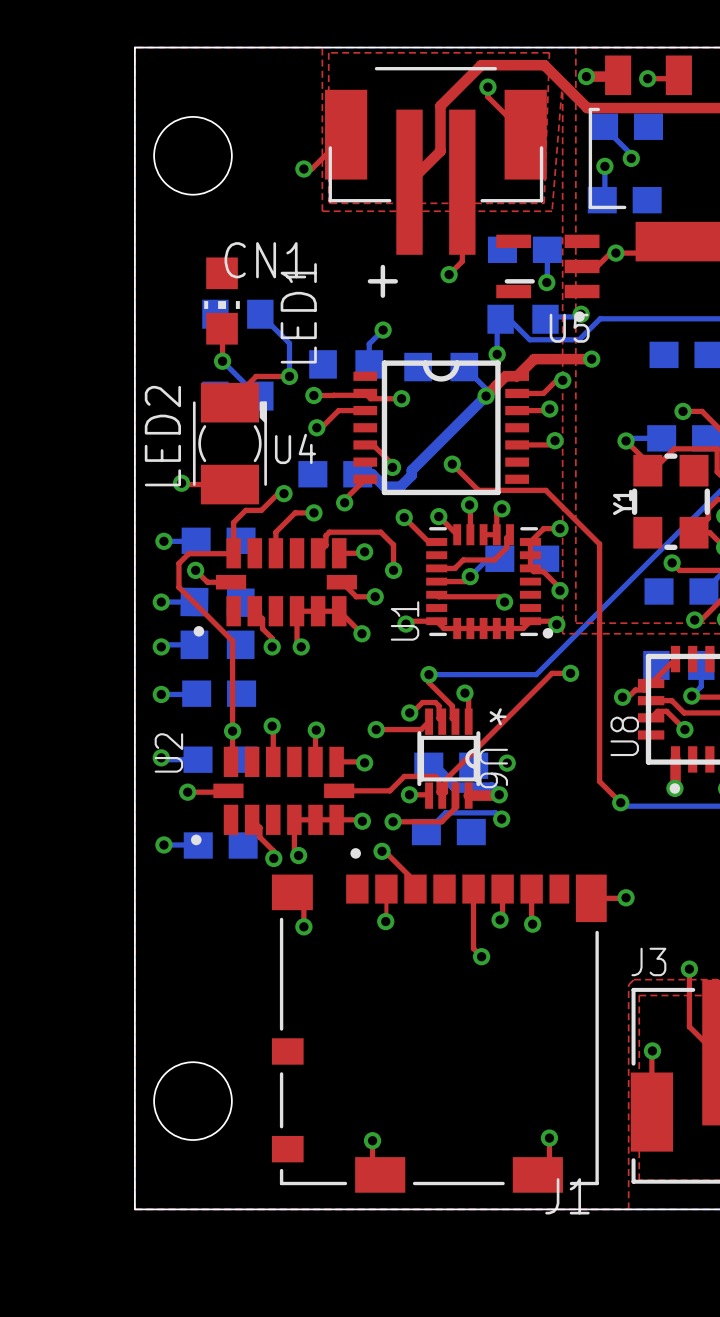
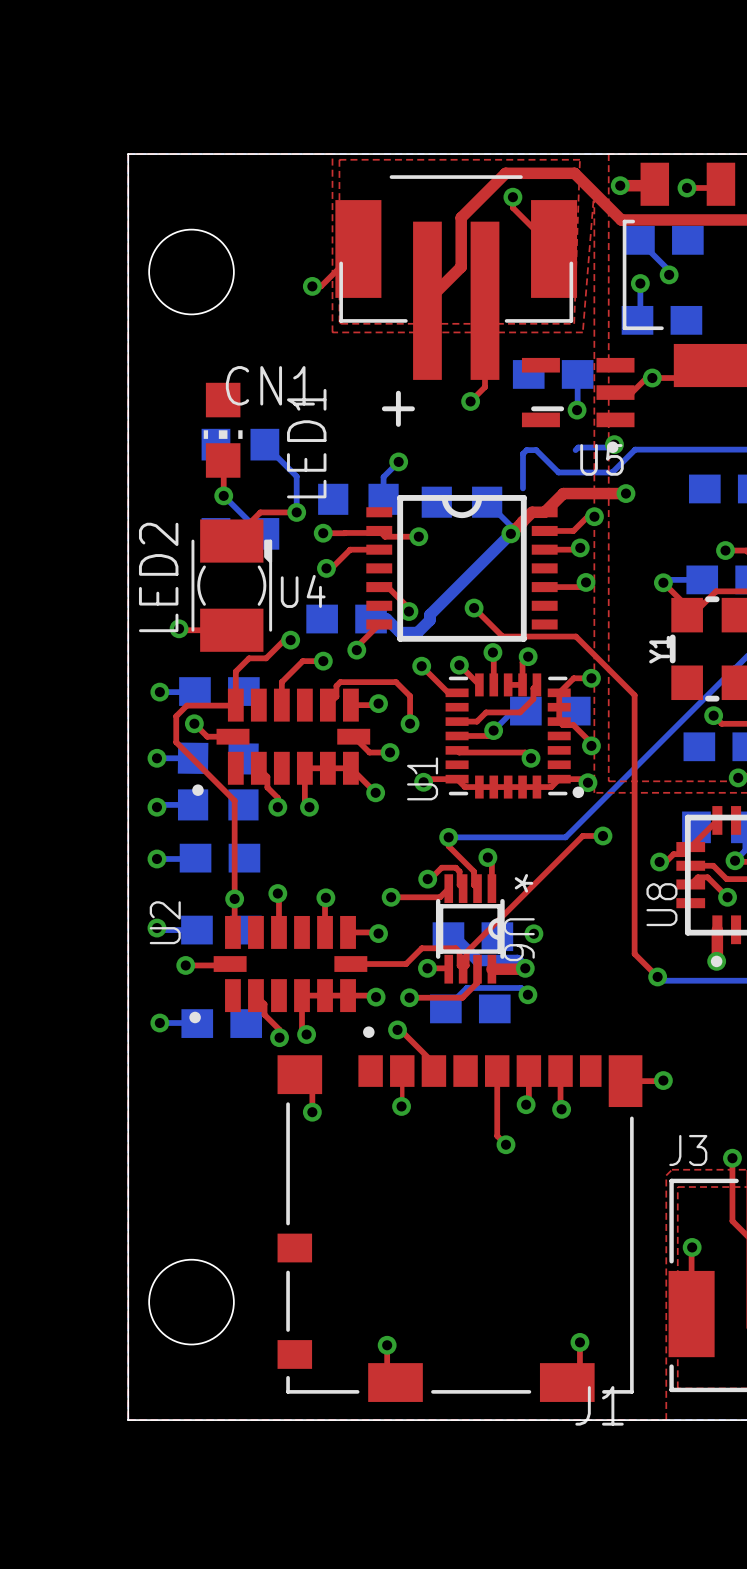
part: (523, 319) -> none
via: (497, 354) -> none

